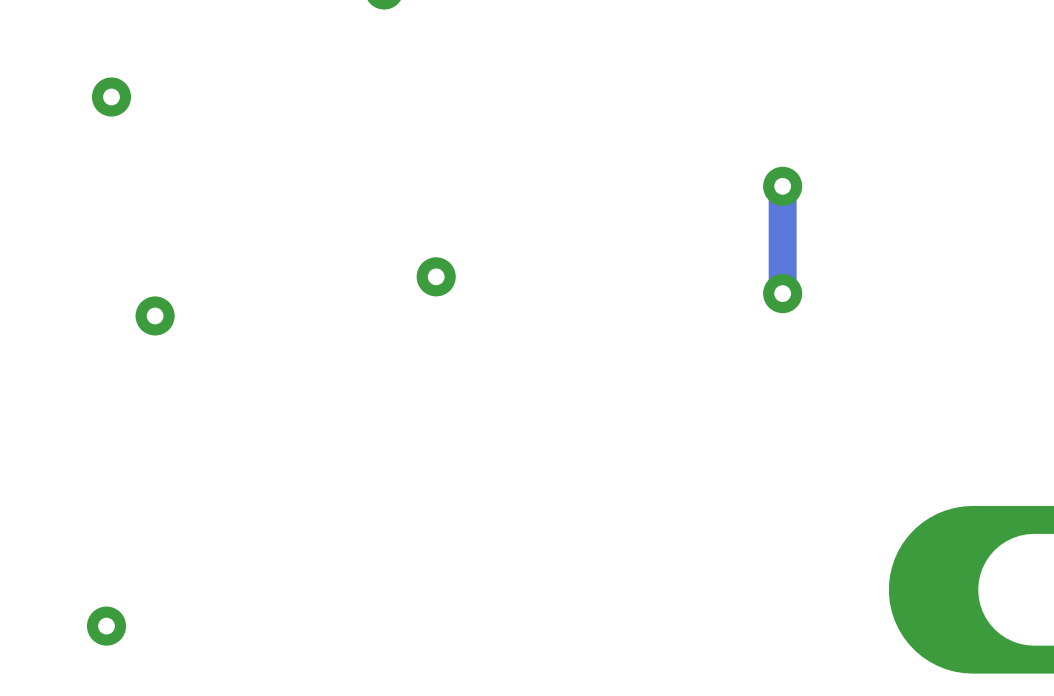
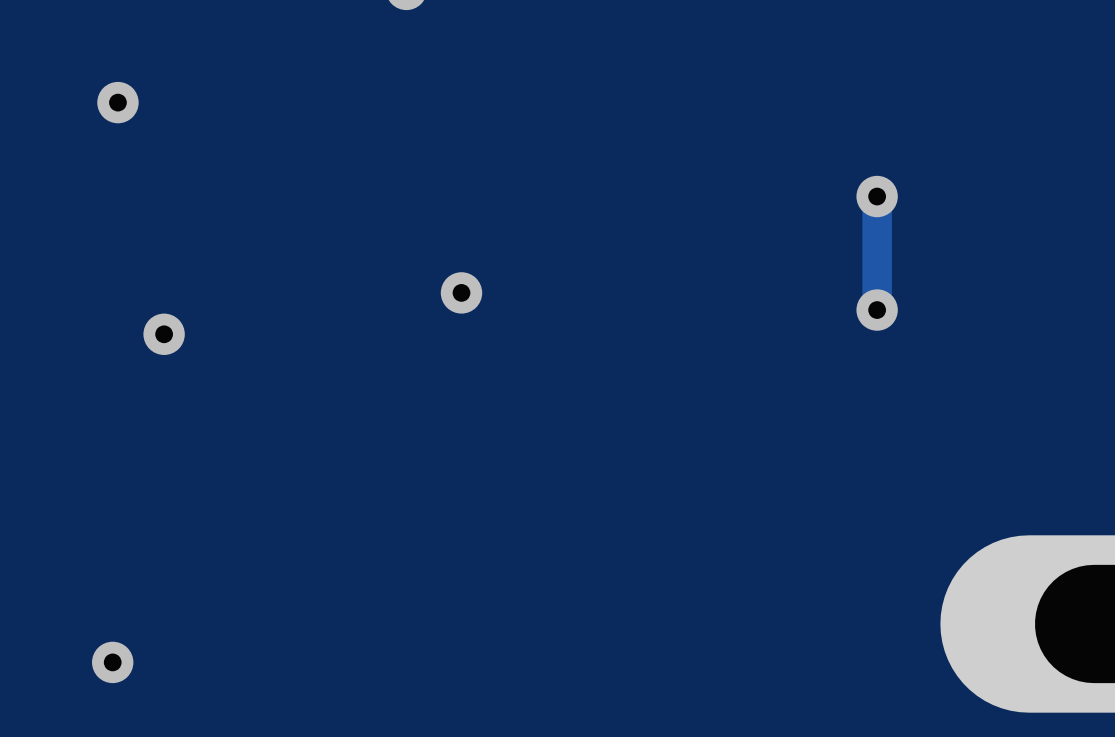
track: (782, 186) (782, 293) -> (877, 196) (877, 310)
via position: (782, 186) -> (877, 196)
via position: (782, 293) -> (877, 310)

